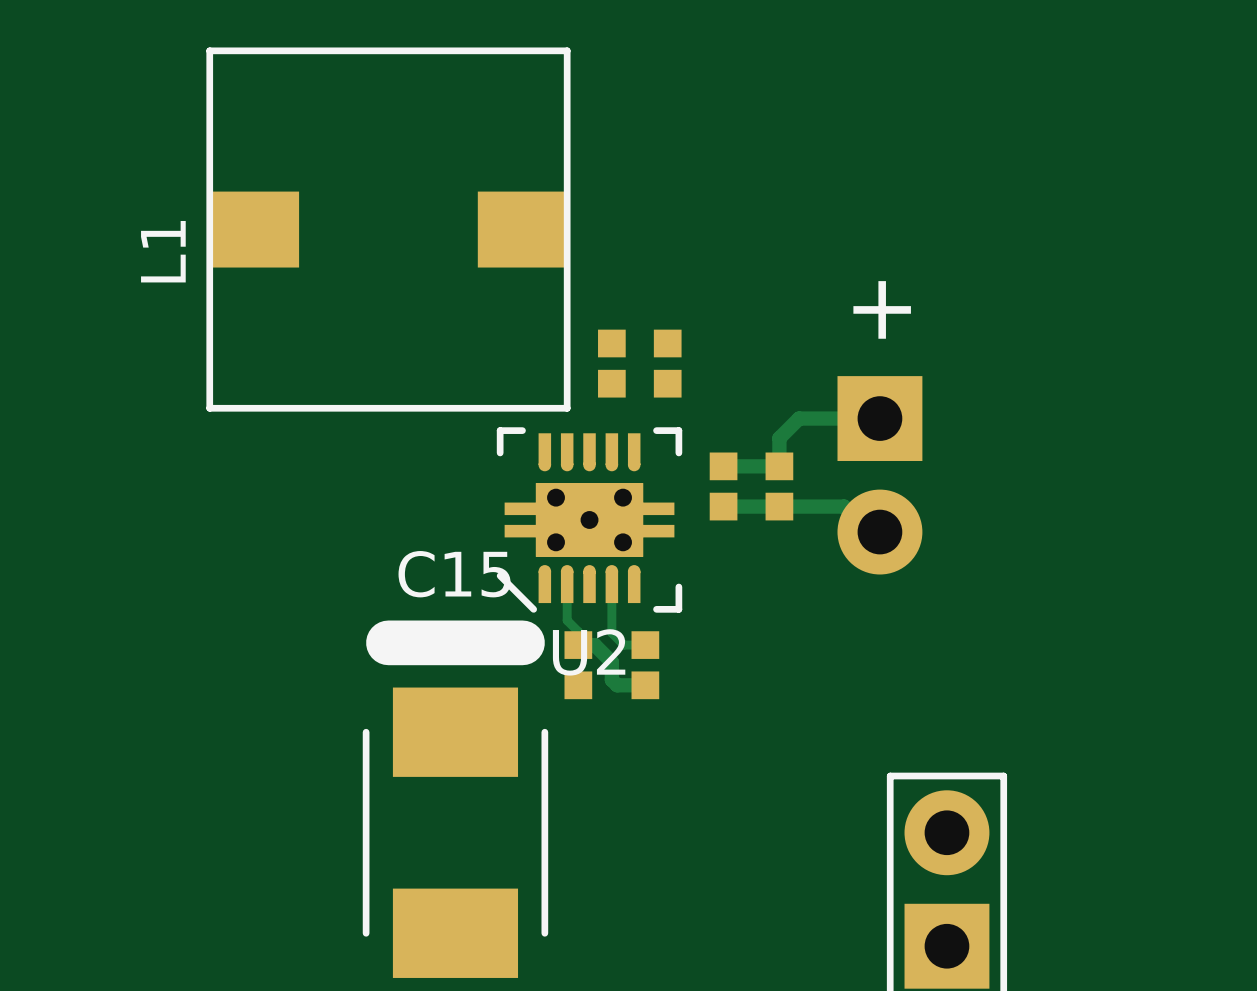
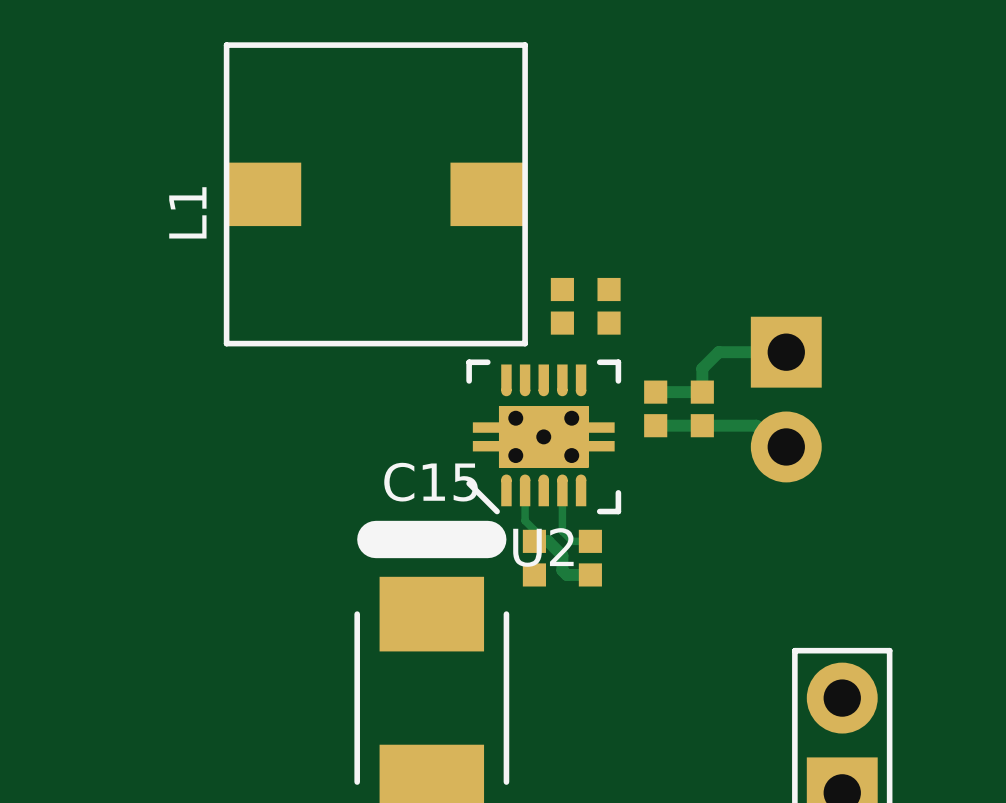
text: + (882, 309) -> none

